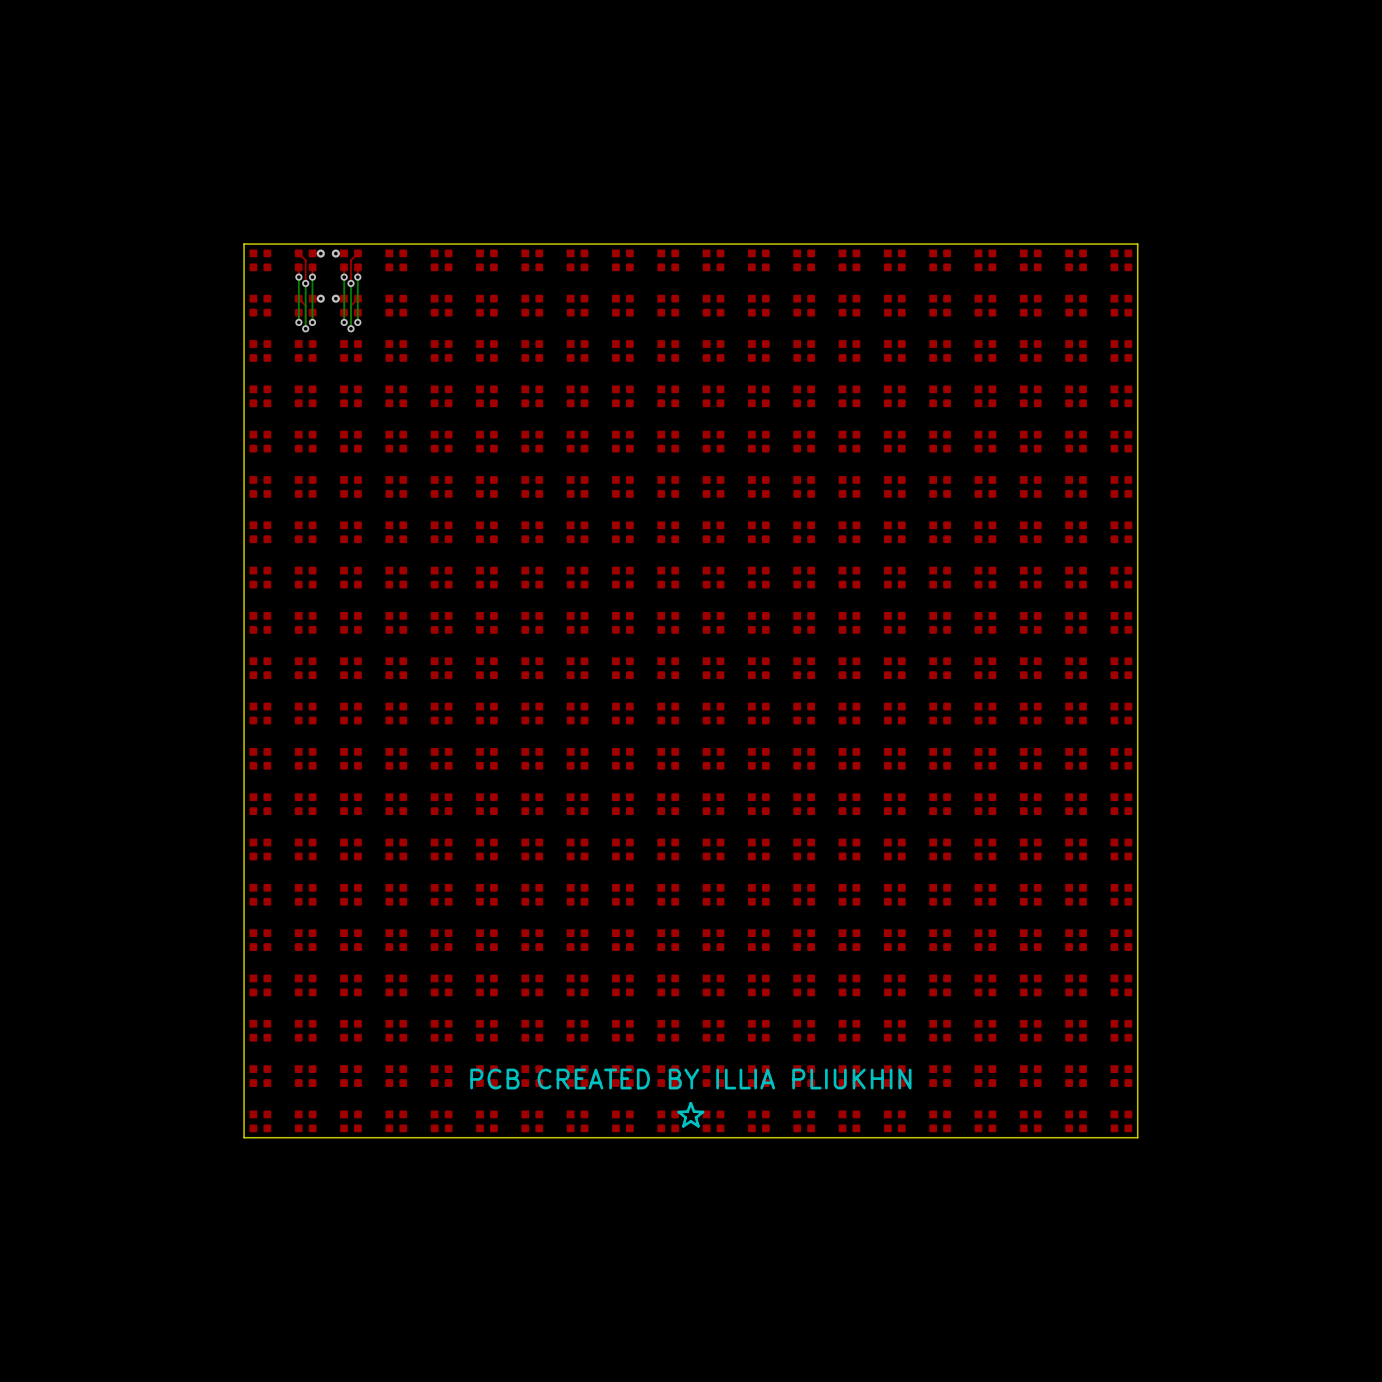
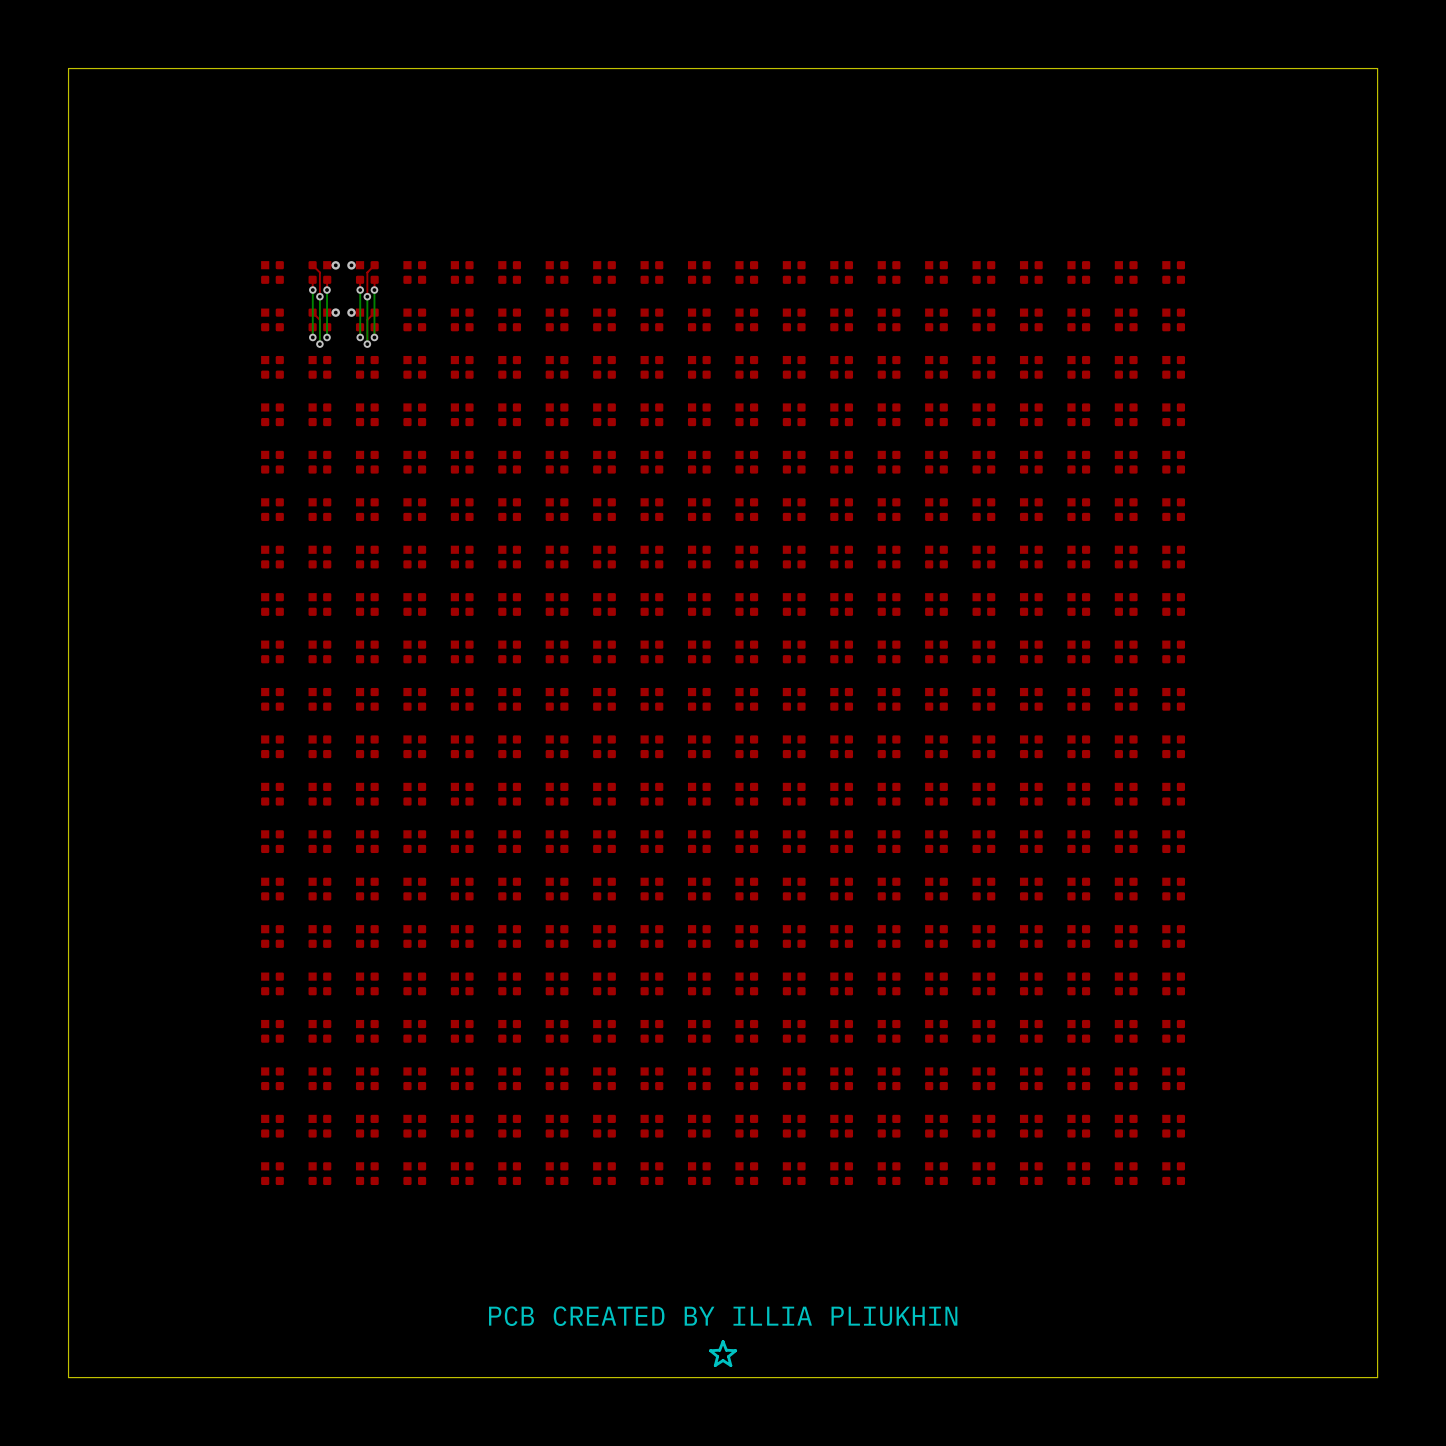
board edge: (1137, 244) (244, 244) (244, 1137) (1137, 1137) (1137, 244) -> (1377, 68) (1377, 1377) (68, 1377) (68, 68) (1377, 68)
text position: PCB CREATED BY ILLIA PLIUKHIN (690, 1079) -> PCB CREATED BY ILLIA PLIUKHIN (723, 1316)
line: (690, 1103) (694, 1111) (702, 1112) (696, 1117) (698, 1126) (690, 1121) (683, 1126) (685, 1117) (678, 1112) (687, 1111) (690, 1103) -> (723, 1341) (726, 1350) (735, 1350) (728, 1356) (730, 1365) (723, 1360) (715, 1365) (717, 1356) (710, 1350) (719, 1350) (723, 1341)

